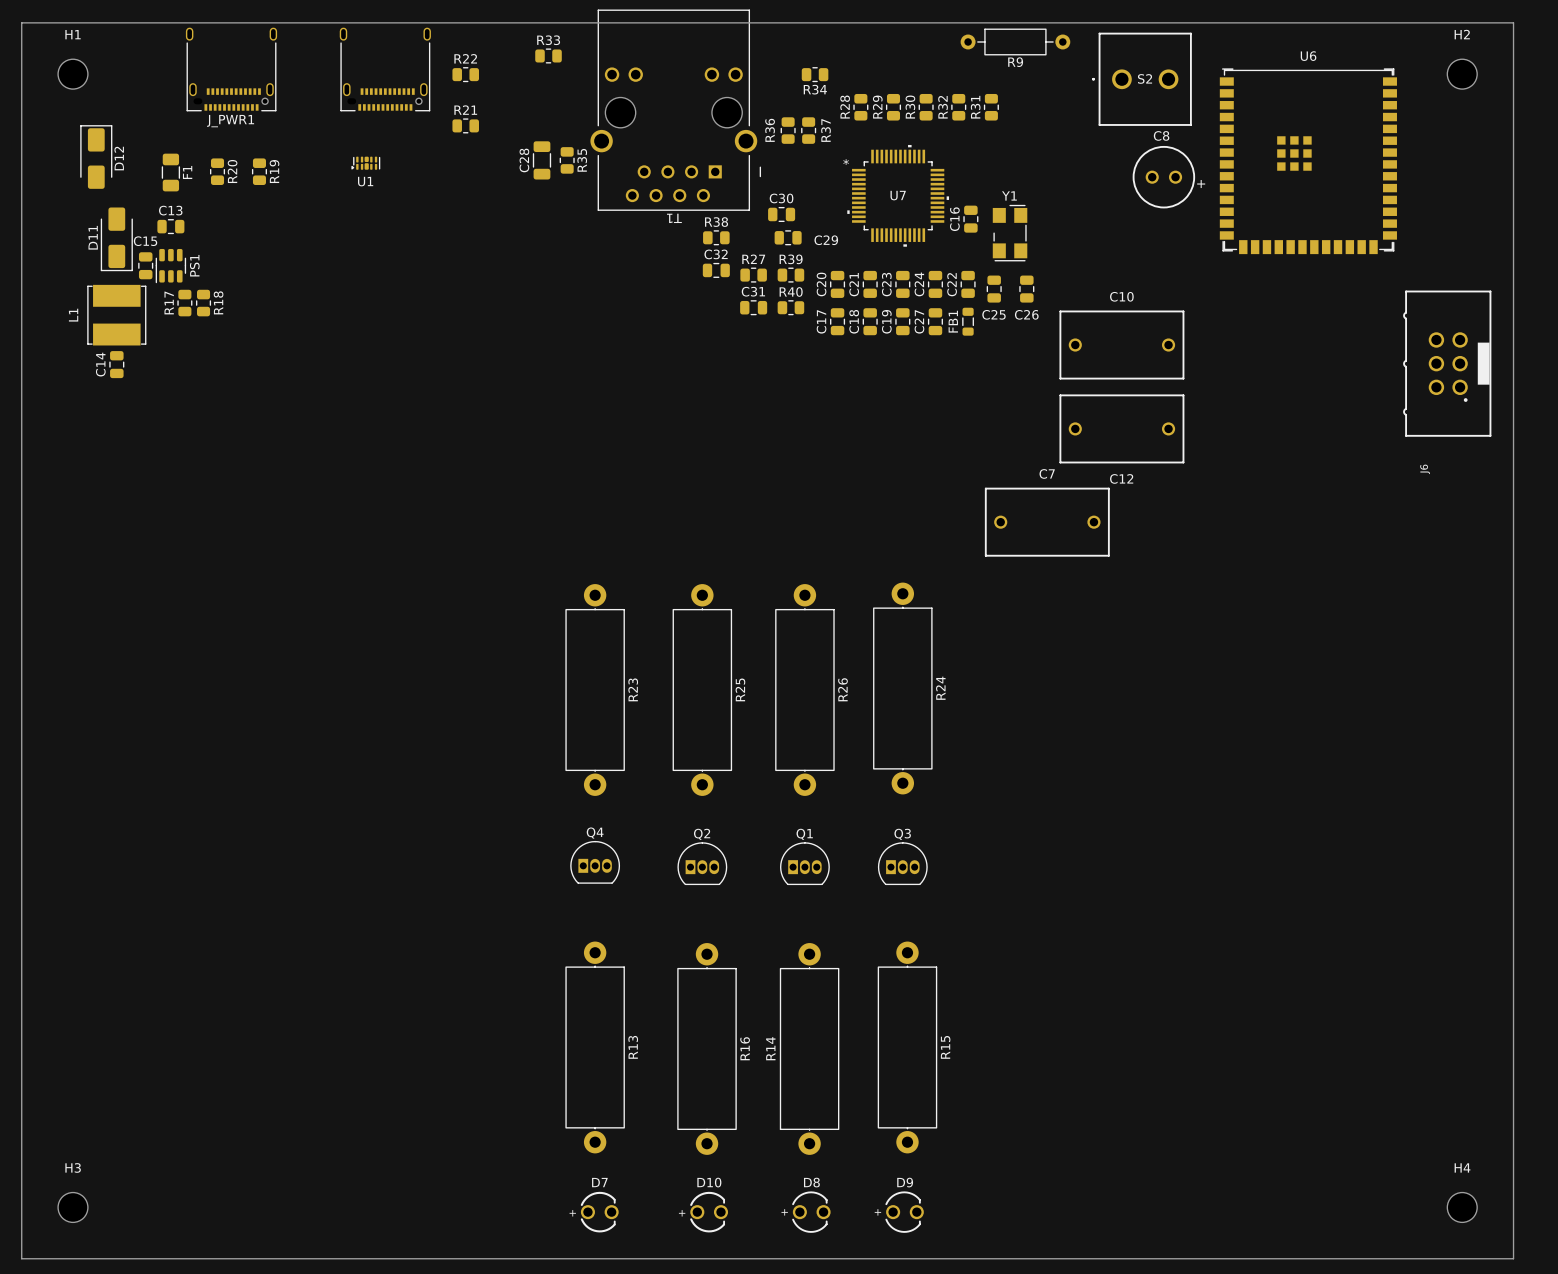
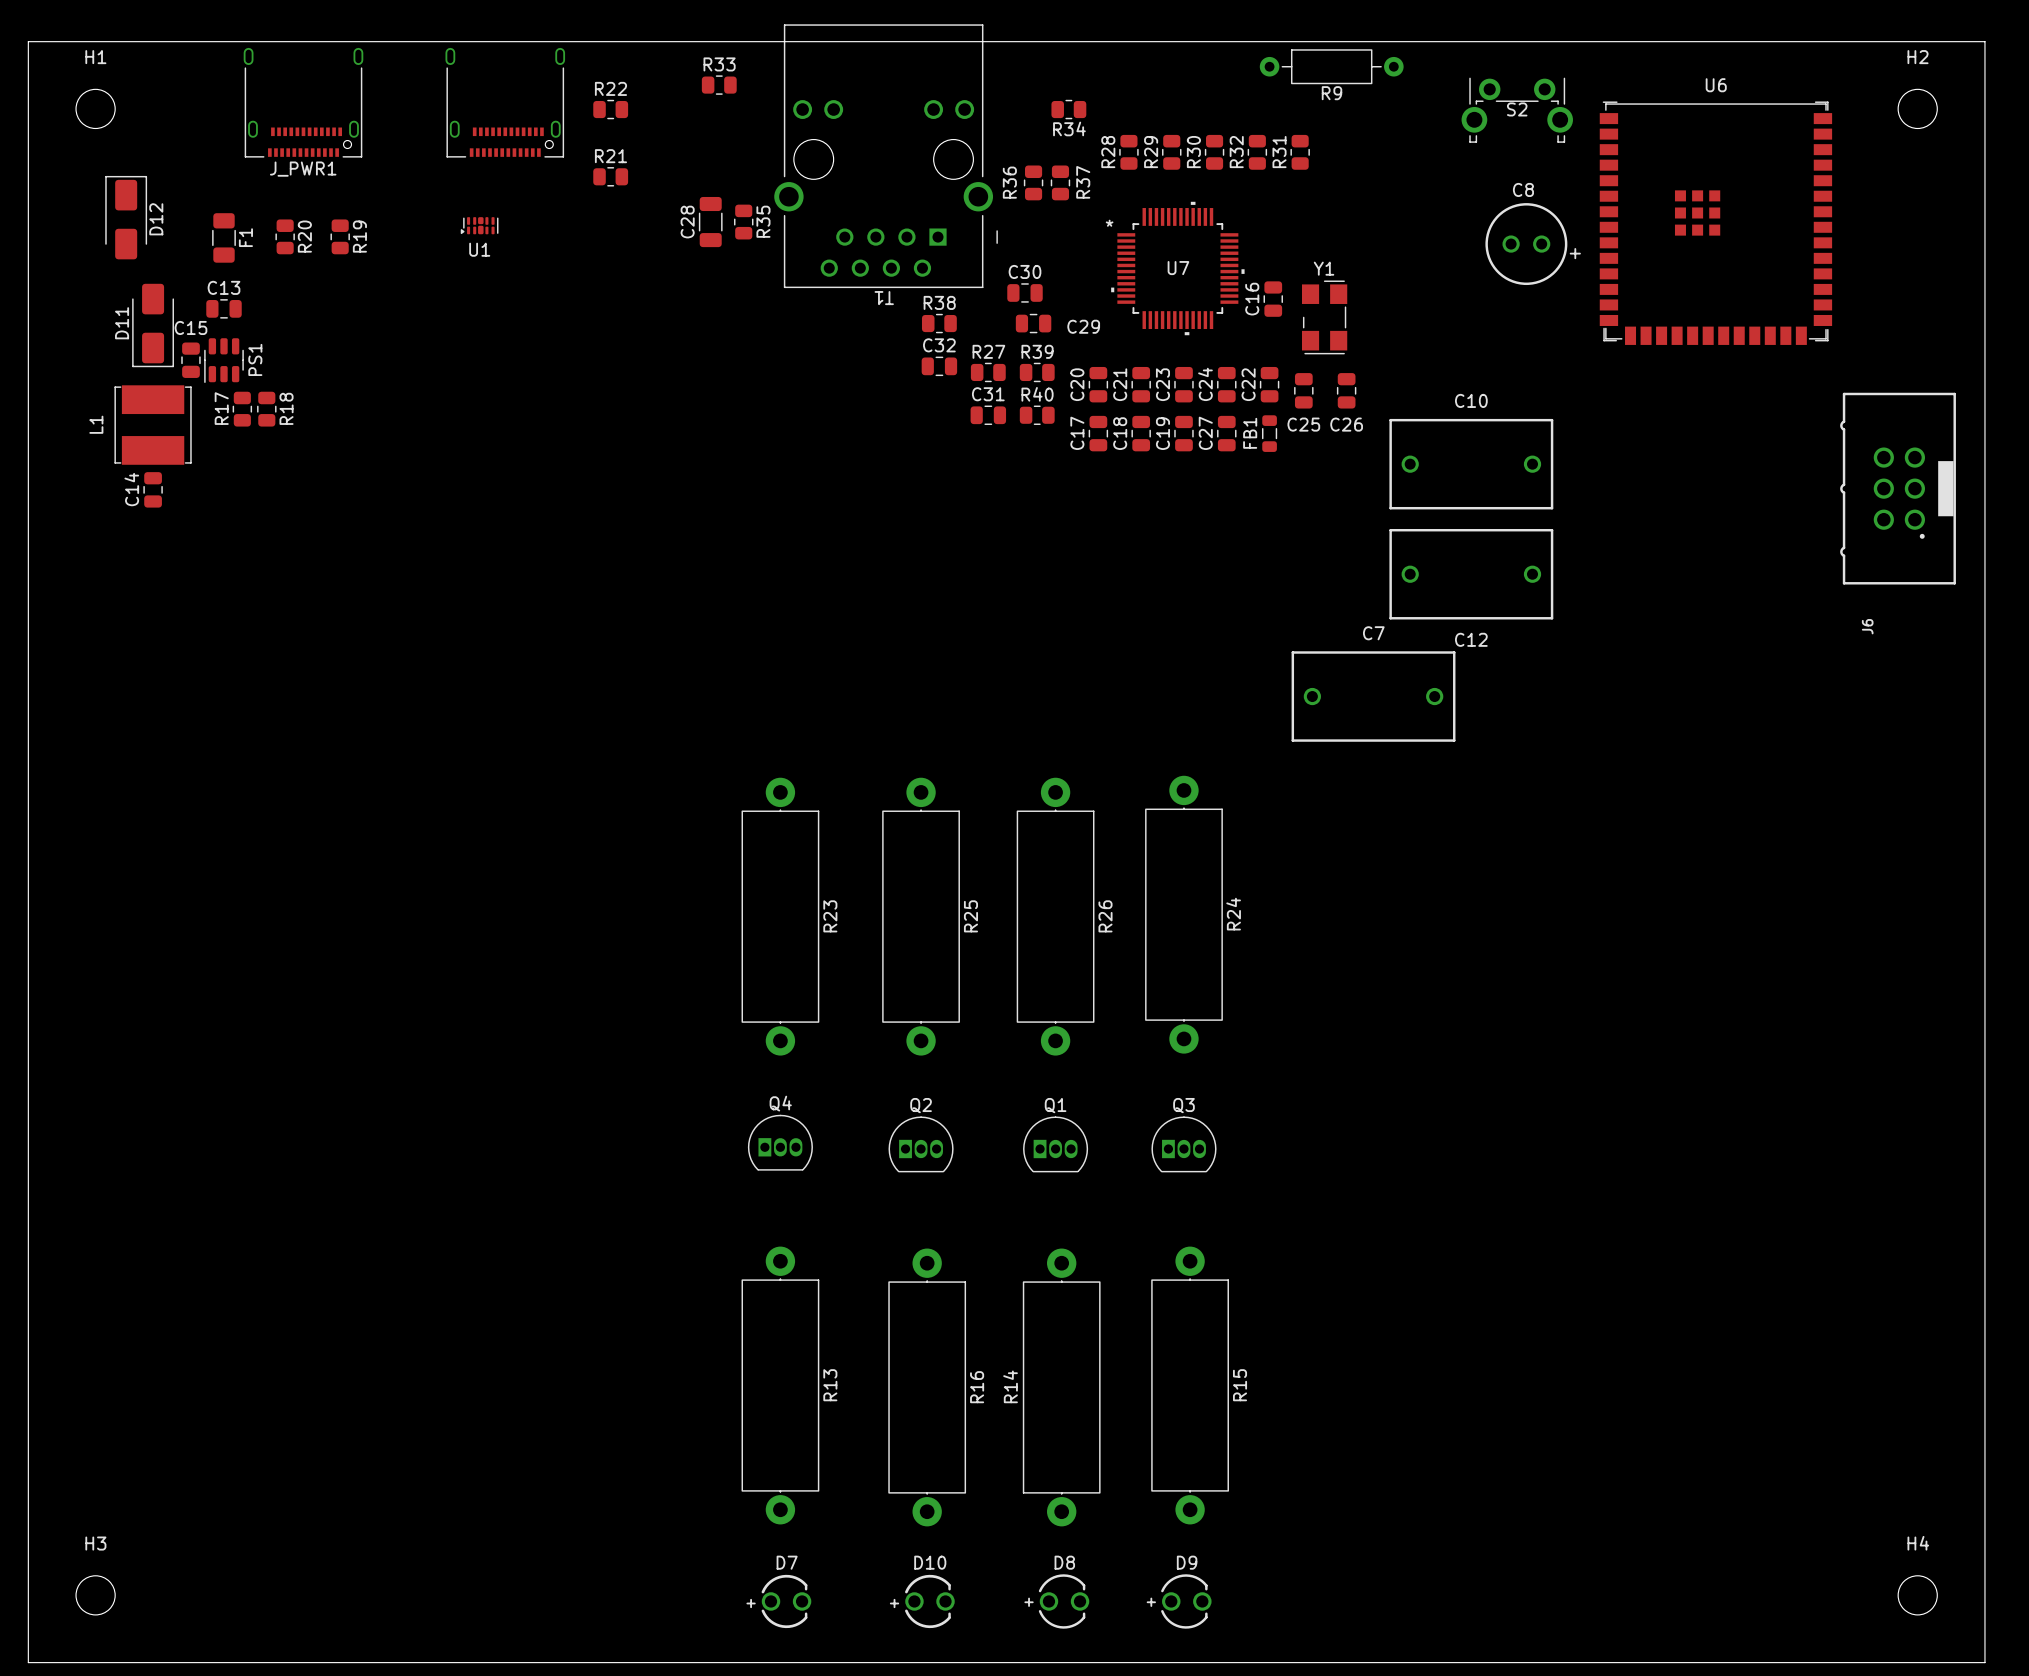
S2 footprint: [1092, 32, 1192, 126] -> [1461, 77, 1573, 143]

